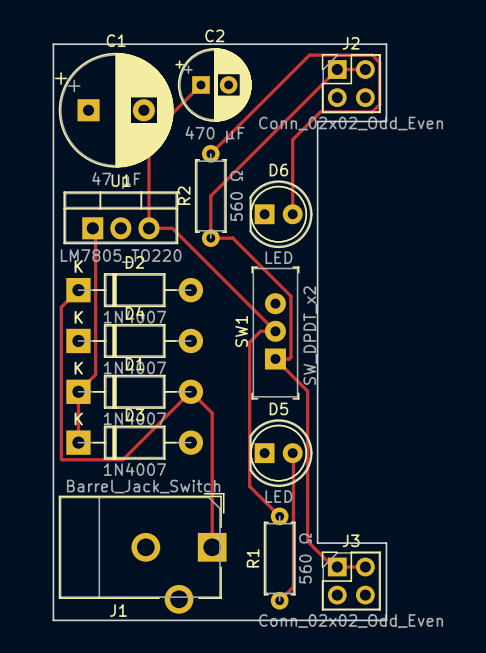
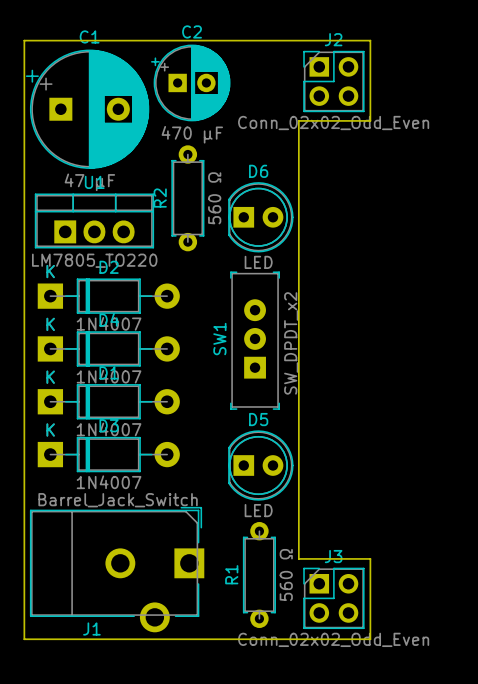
track: (365, 69) (337, 69) (210, 195) (210, 238) (232, 238) (290, 296) (290, 357) (275, 359) (307, 391) (307, 541) (333, 566) (365, 566) -> none
track: (200, 84) (148, 136) (148, 228) (172, 228) (275, 331) (260, 331) (249, 342) (249, 486) (279, 516) -> none
track: (210, 153) (309, 55) (372, 55) (379, 62) (379, 104) (372, 112) (320, 112) (292, 139) (292, 214) -> none
track: (92, 228) (95, 231) (95, 374) (78, 391) (78, 442) -> none
track: (78, 290) (61, 307) (61, 458) (122, 459) (190, 391) (212, 413) (212, 547) -> none
track: (292, 453) (293, 586) (279, 600) -> none

